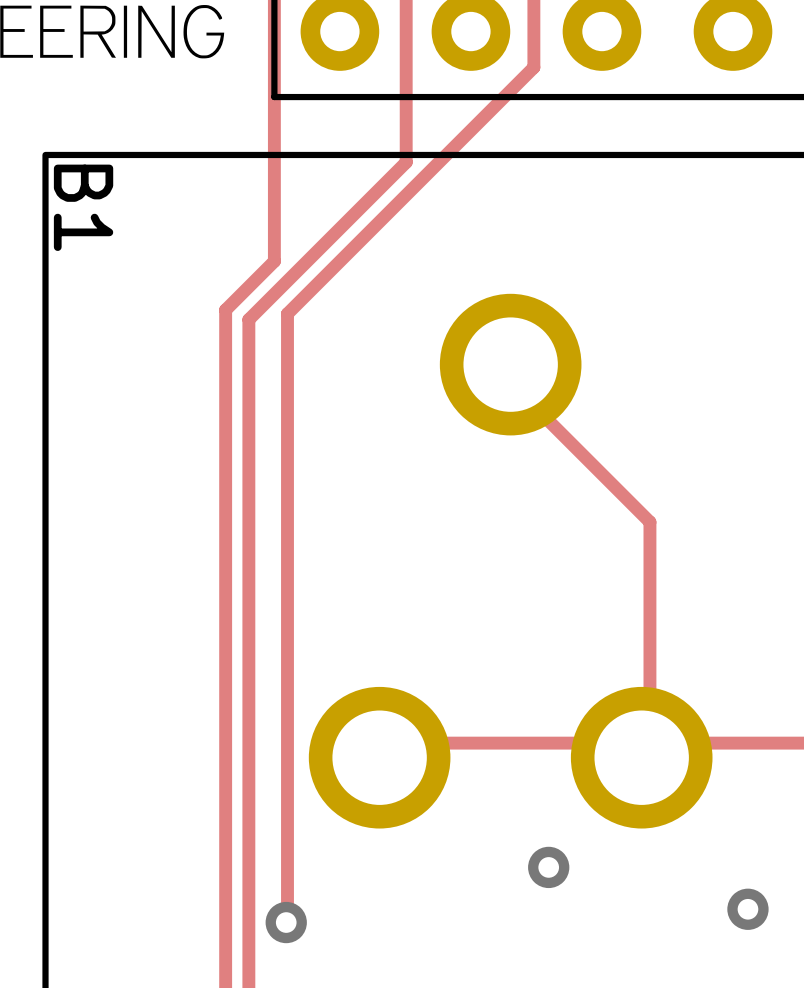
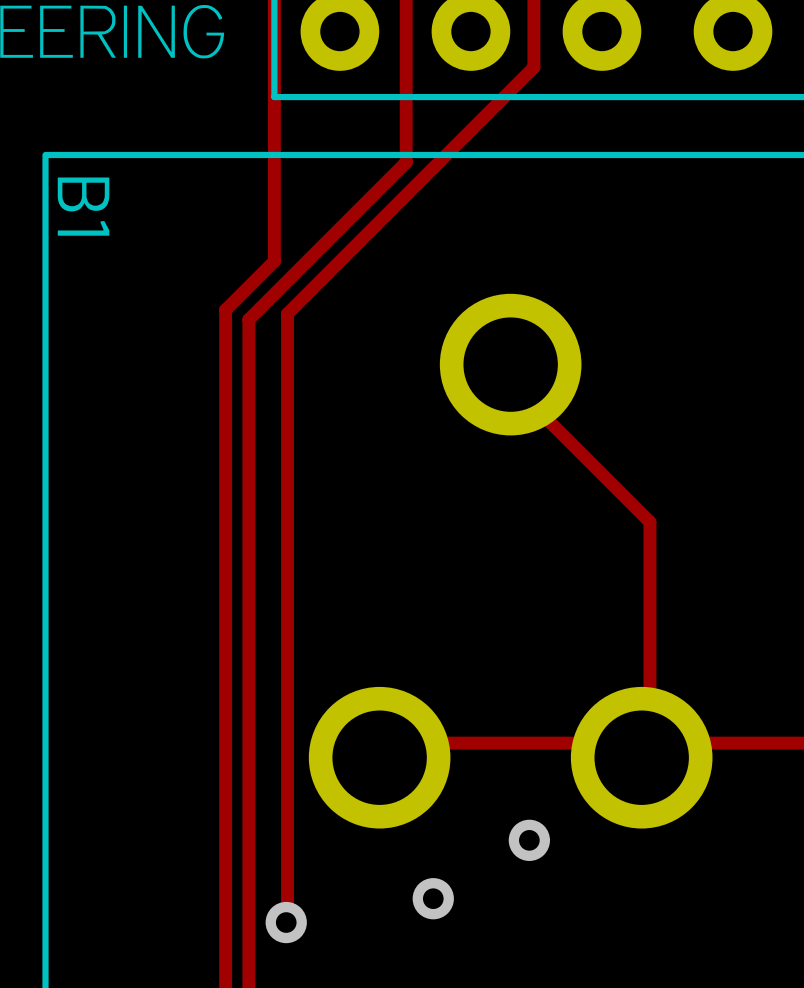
via position: (548, 867) -> (529, 840)
via: none -> (433, 898)
via: (747, 909) -> none

